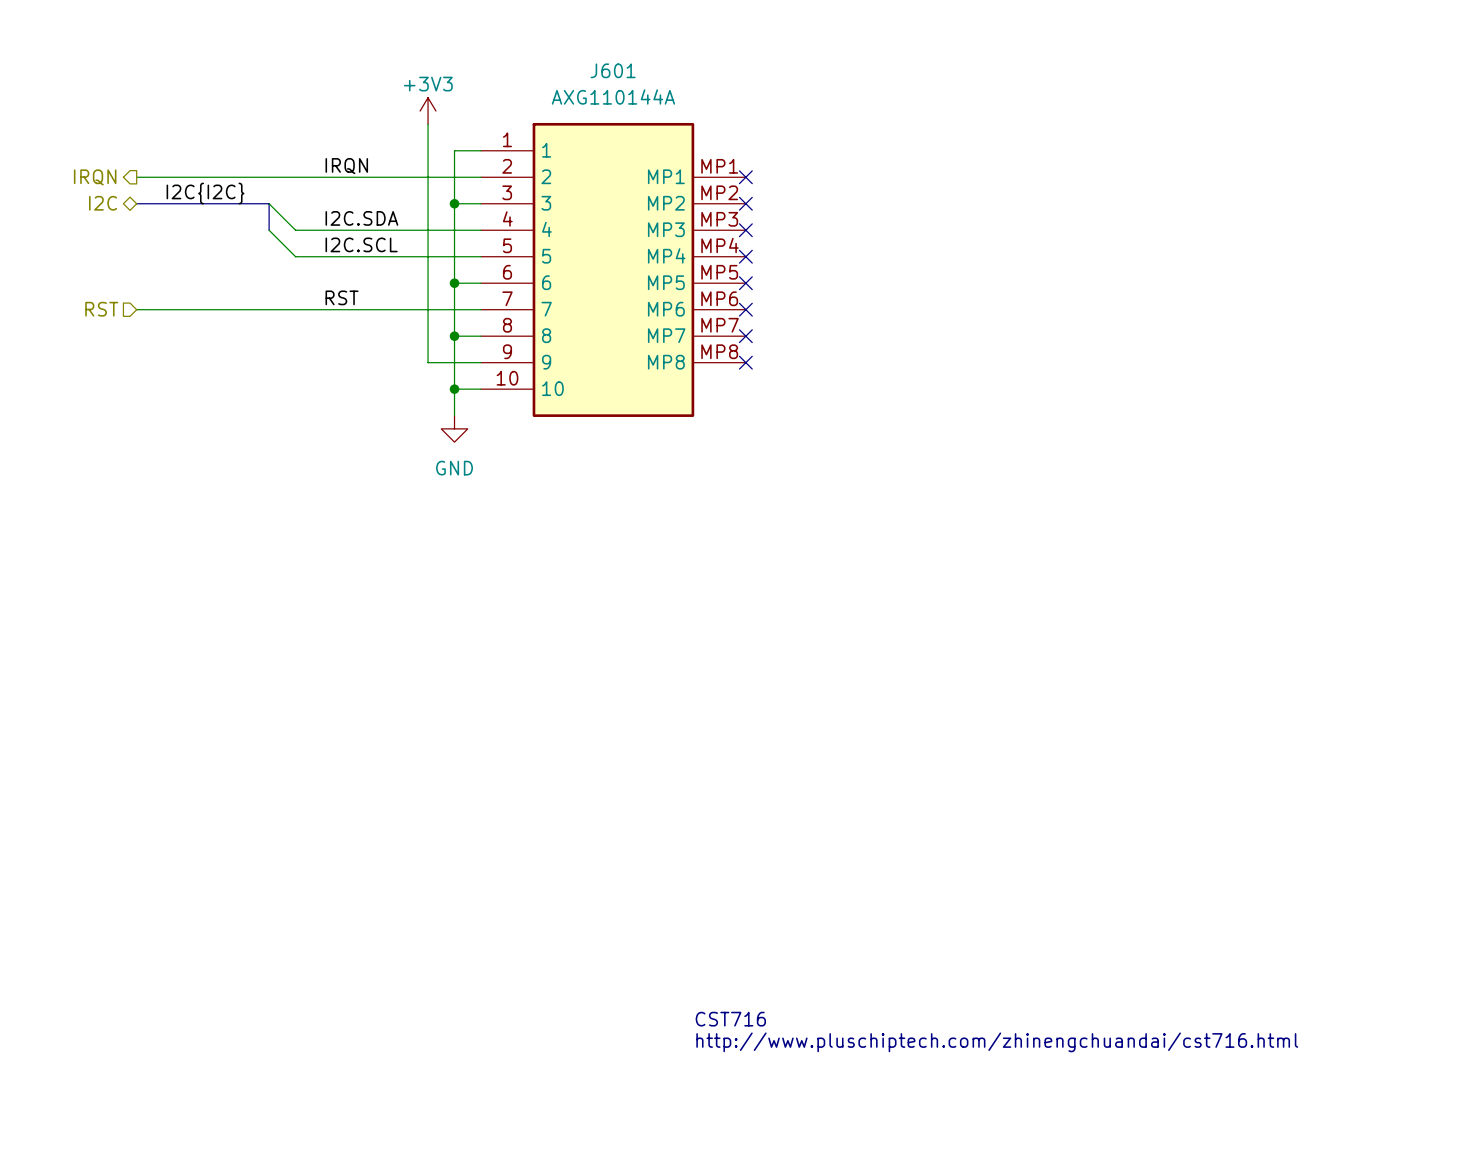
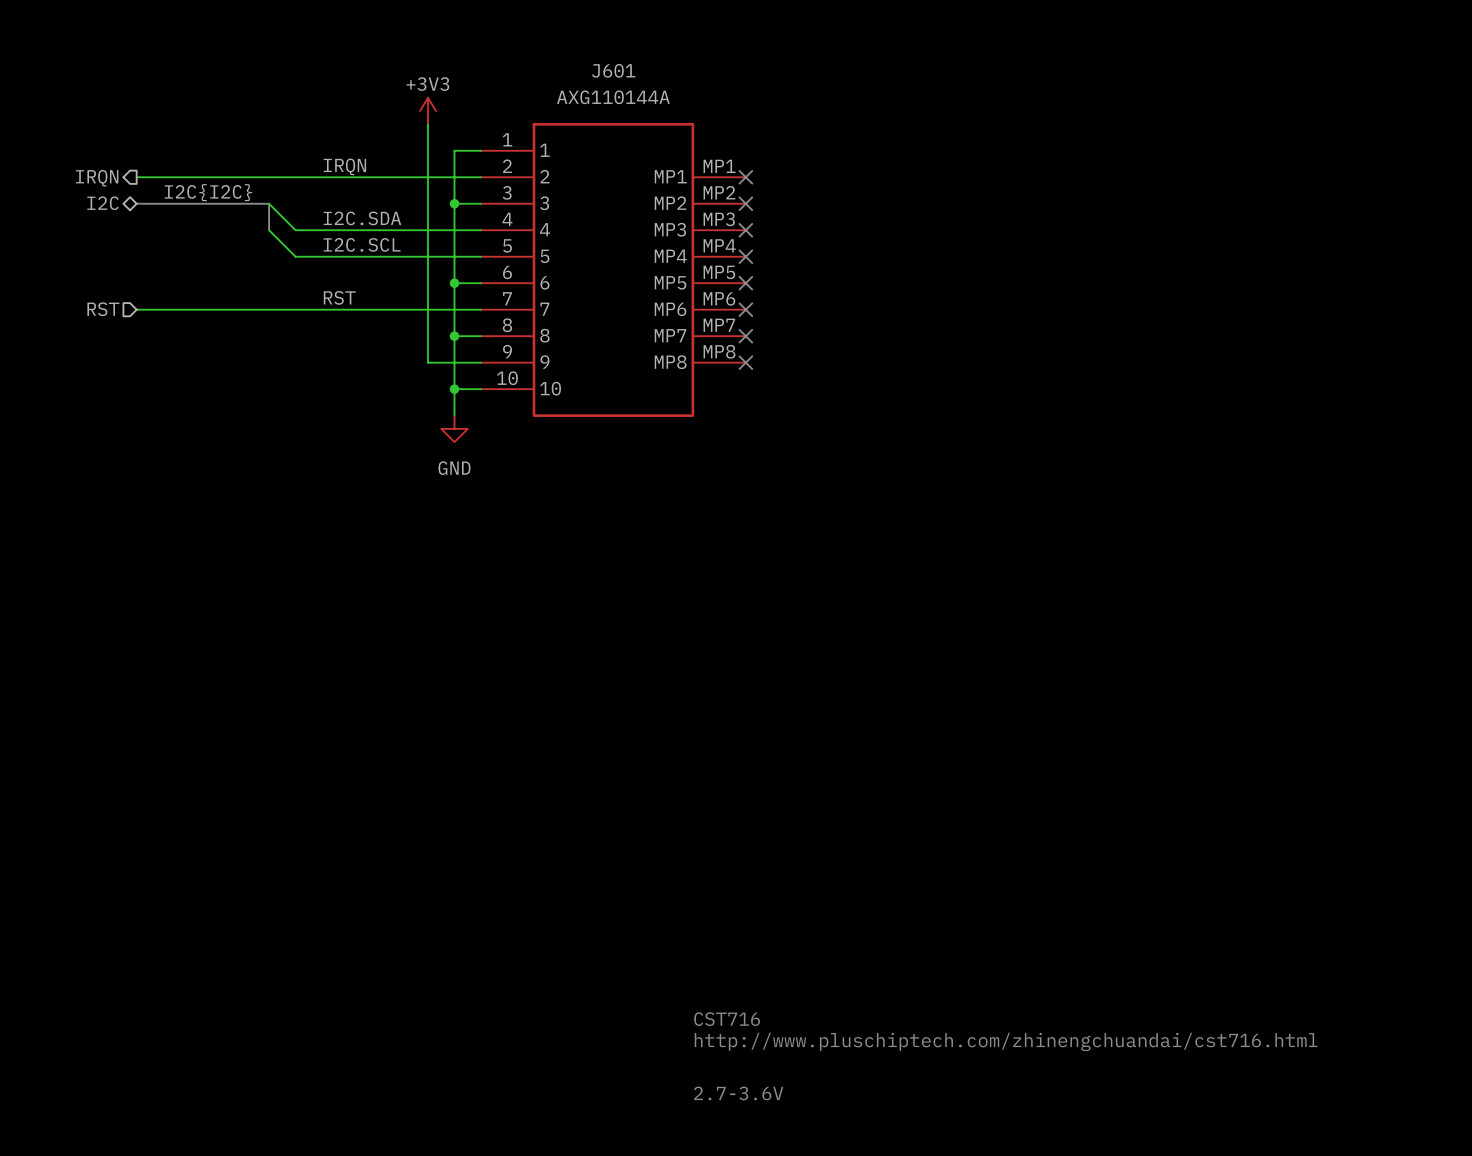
text: none -> 2.7-3.6V (738, 1093)

